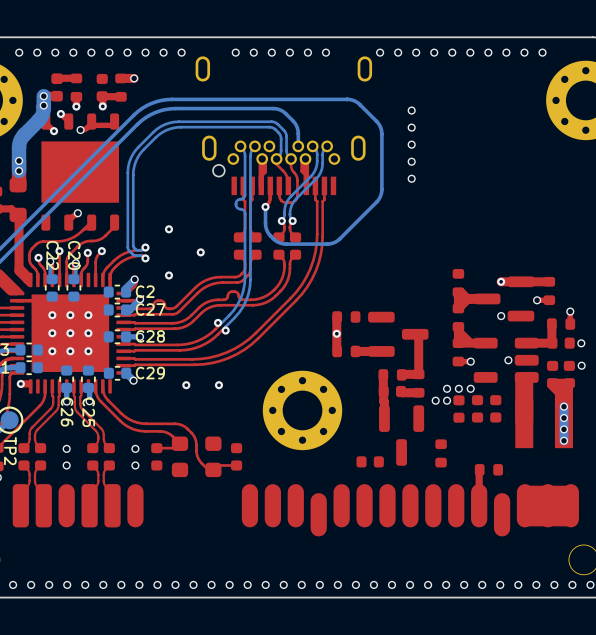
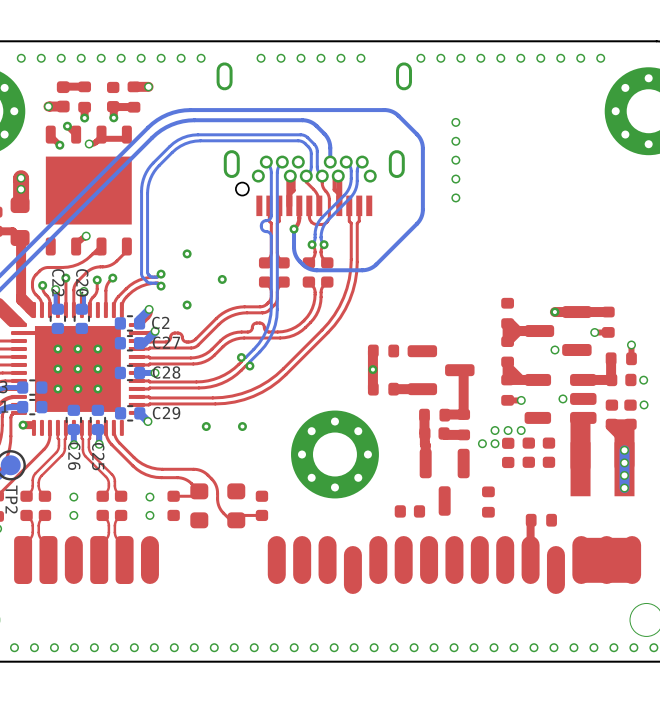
bottom track: (43, 96) (41, 116) (19, 142) (19, 171) -> none
via: (43, 105) -> none

